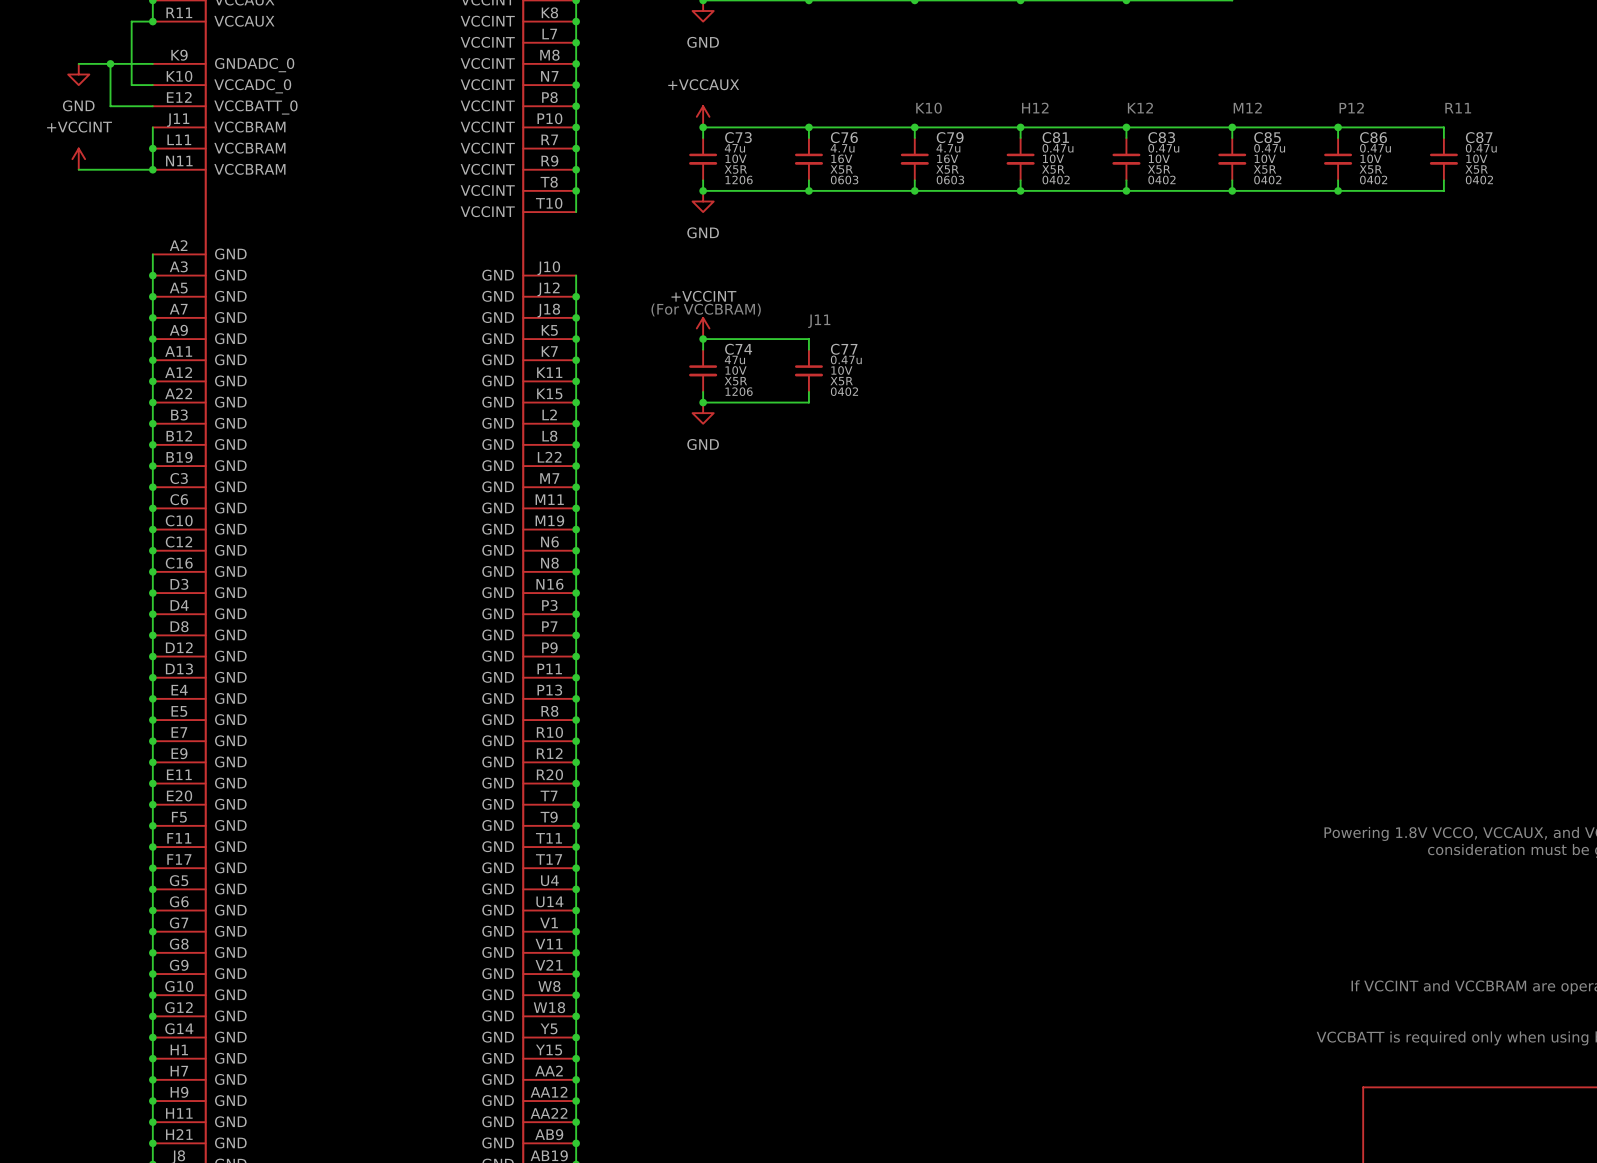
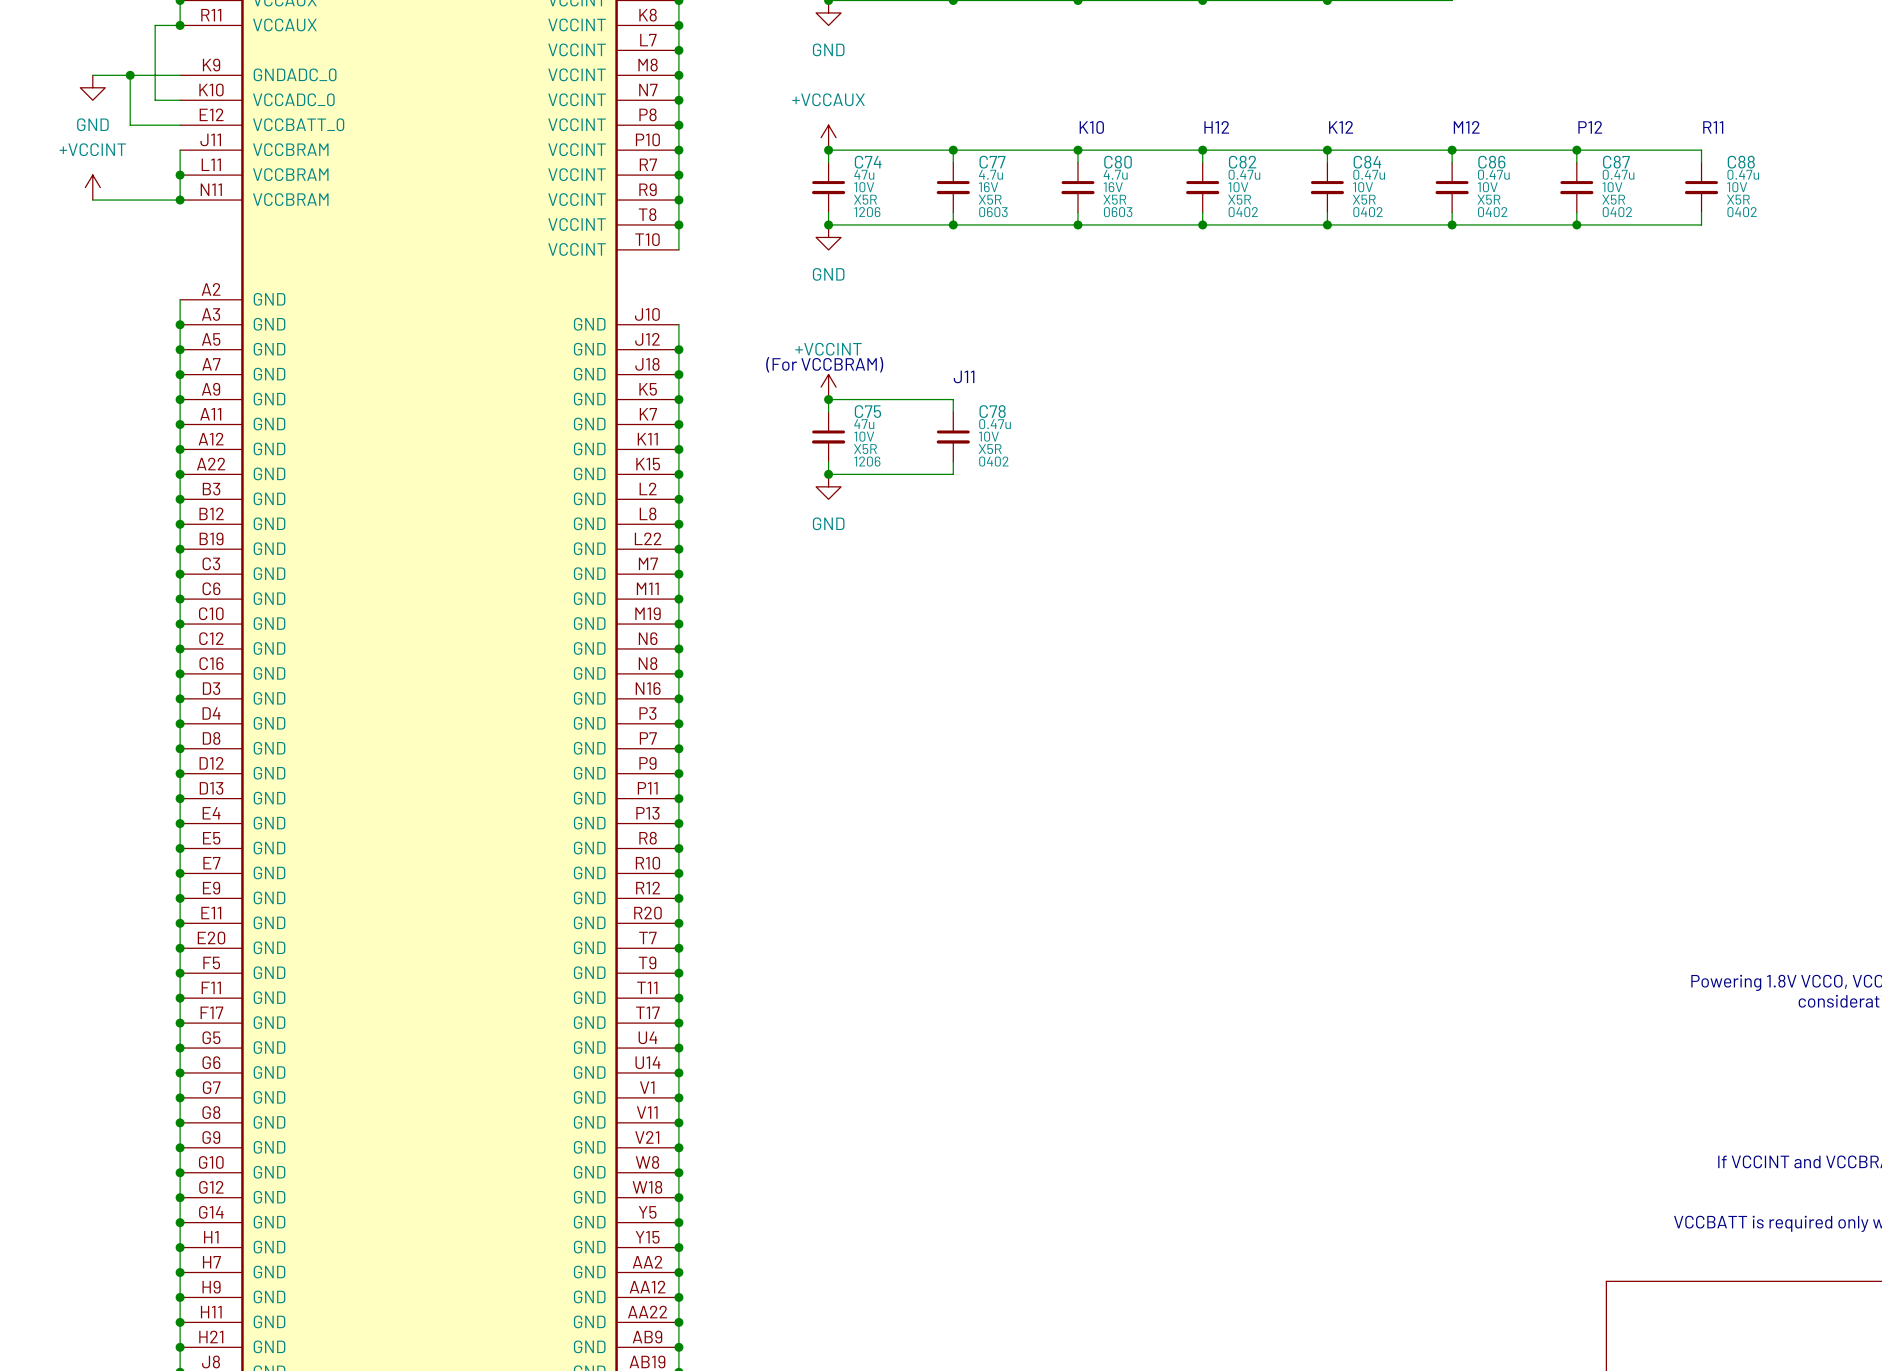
C73 name: C73 (738, 137) -> C74 (868, 162)
C76 name: C76 (844, 137) -> C77 (992, 162)
C79 name: C79 (950, 137) -> C80 (1118, 162)
C81 name: C81 (1055, 137) -> C82 (1242, 162)
C83 name: C83 (1161, 137) -> C84 (1367, 162)
C85 name: C85 (1267, 137) -> C86 (1491, 162)
C86 name: C86 (1373, 137) -> C87 (1616, 162)
C87 name: C87 (1479, 137) -> C88 (1741, 162)
C74 name: C74 (738, 349) -> C75 (867, 411)
C77 name: C77 (844, 349) -> C78 (992, 411)

